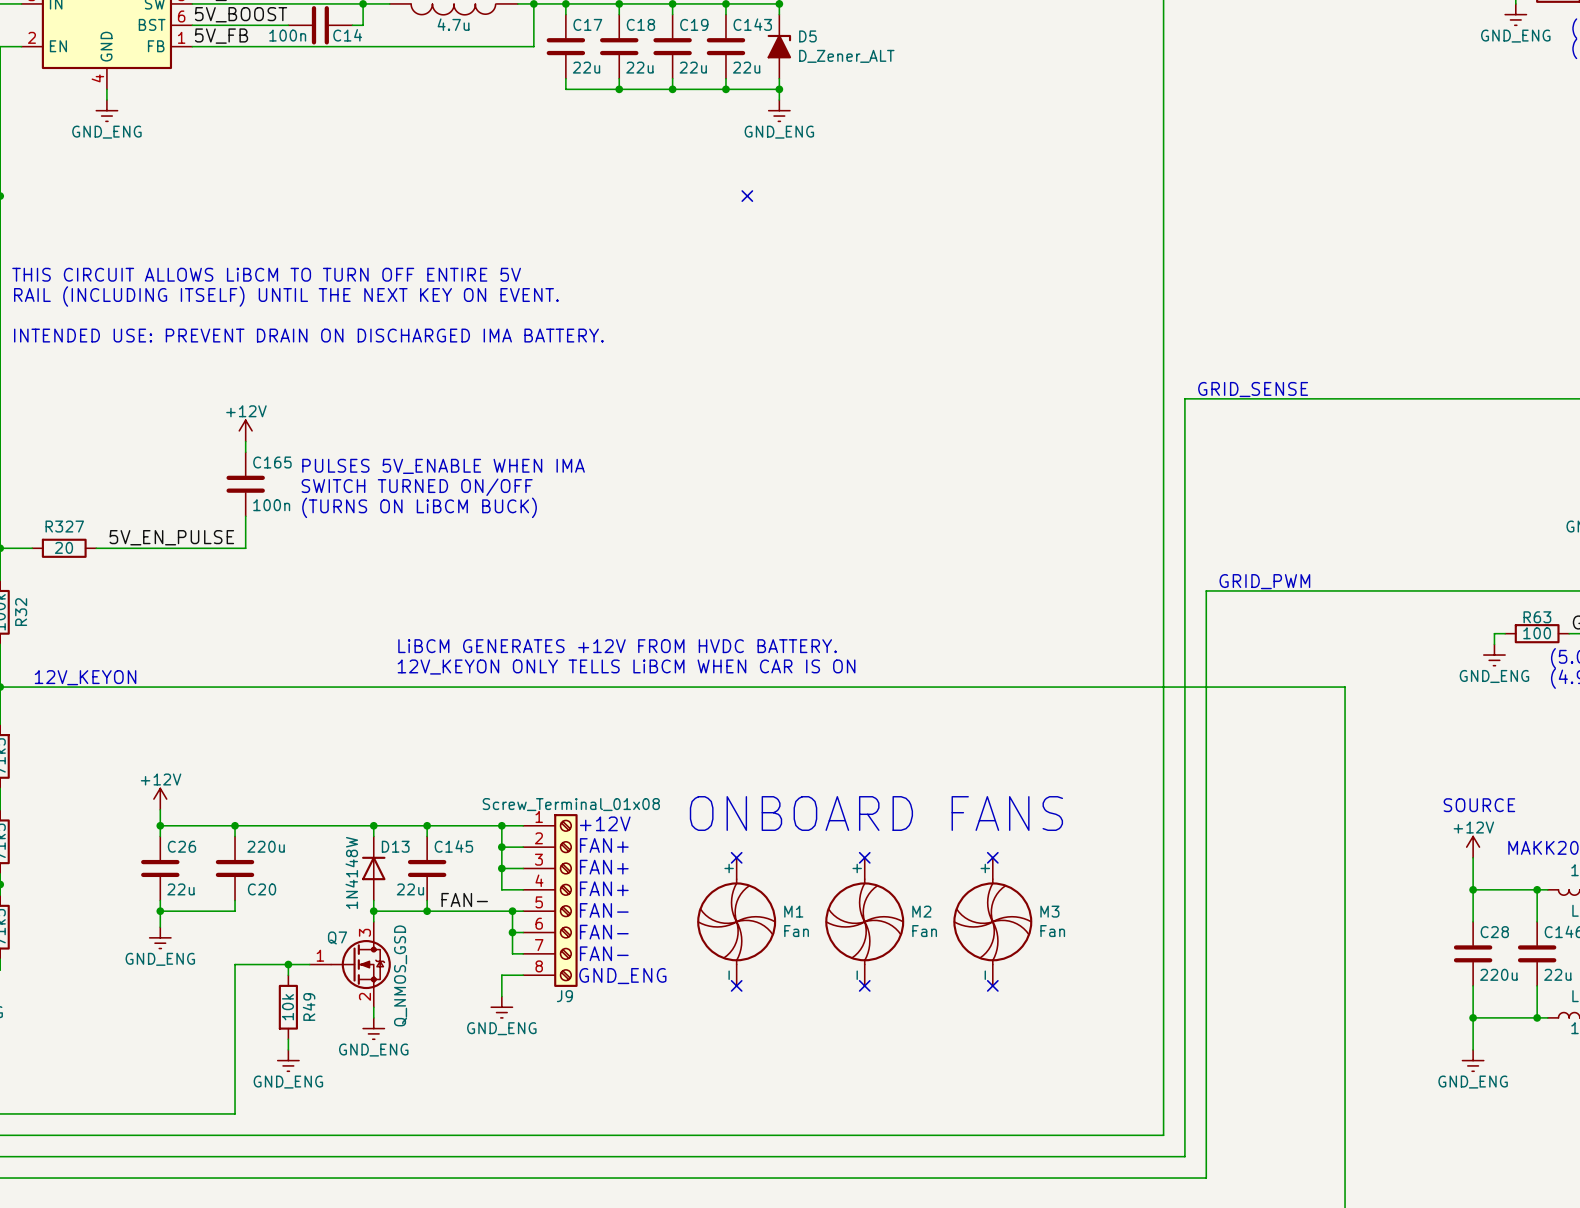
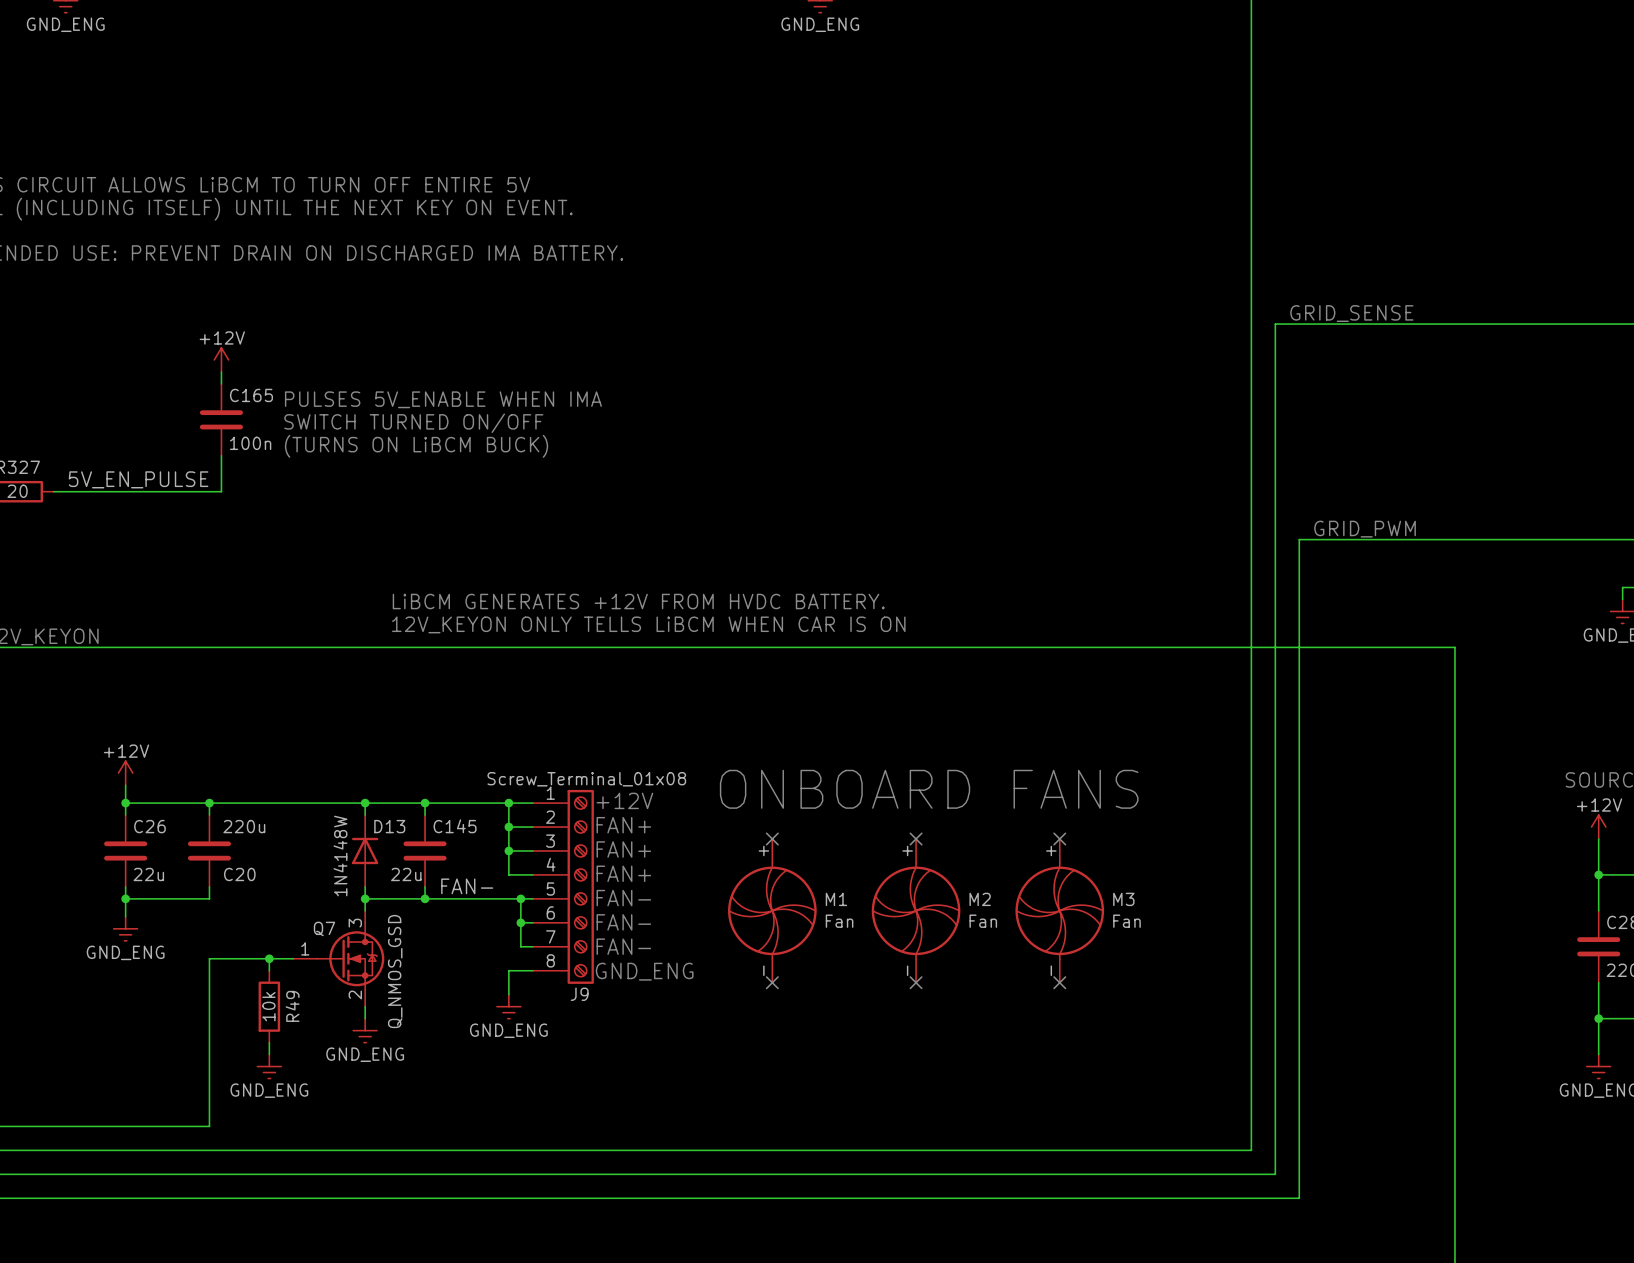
no-connect mark: (747, 196) -> none

